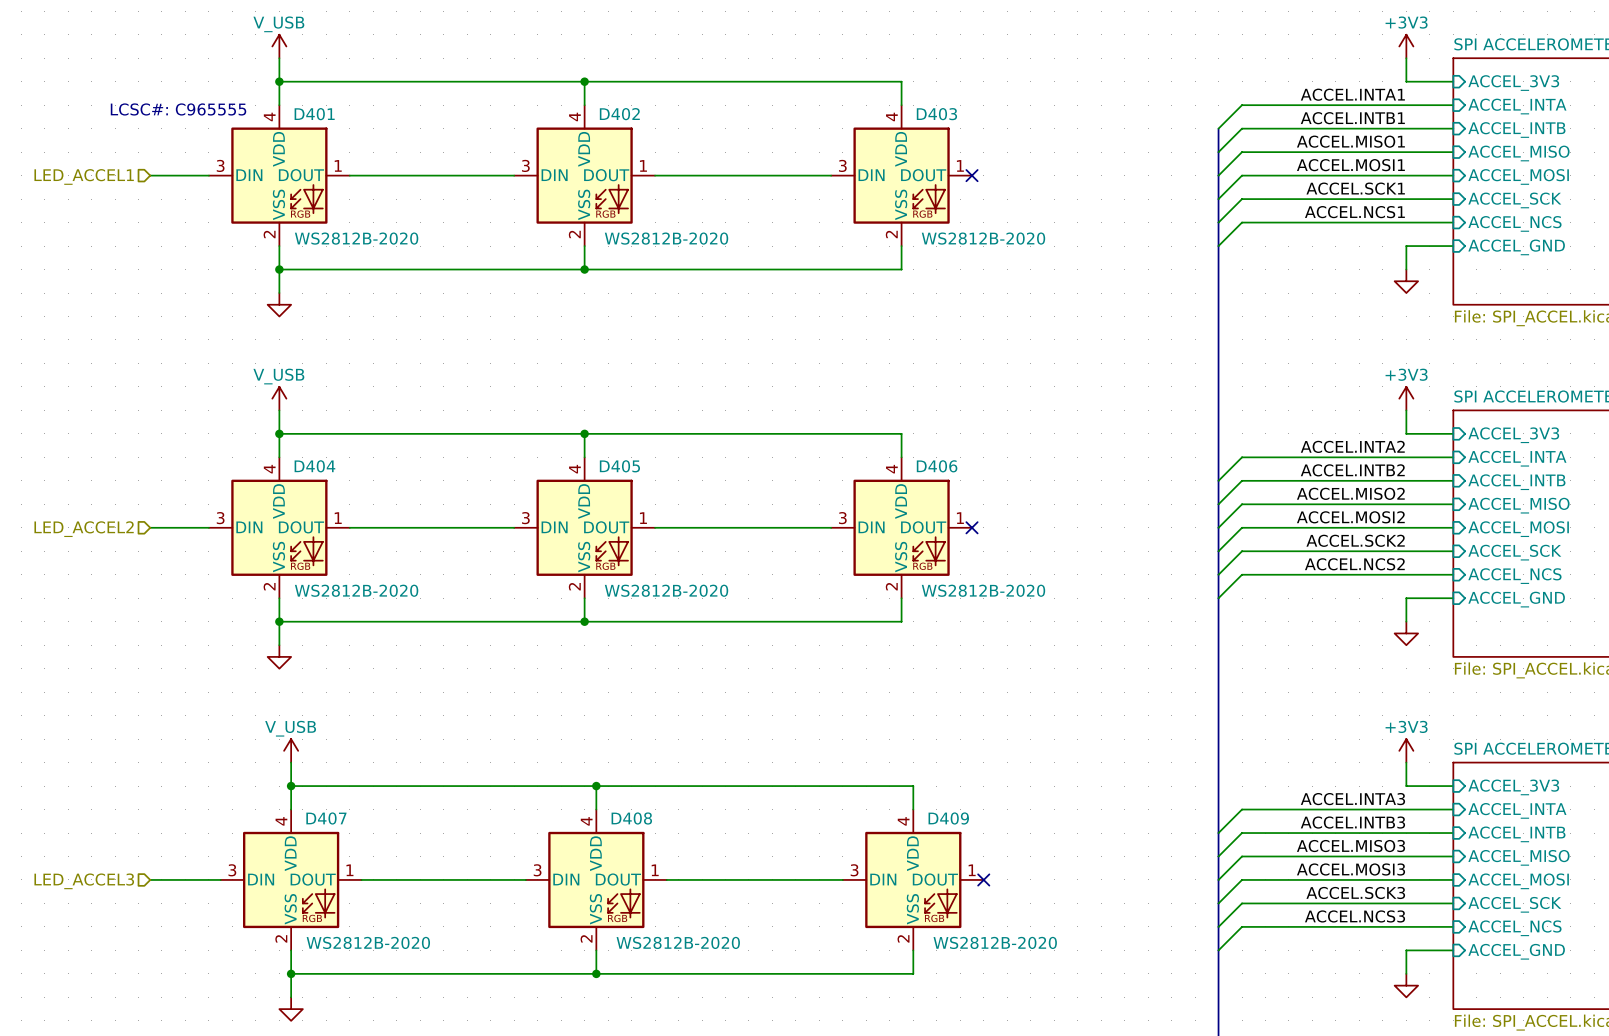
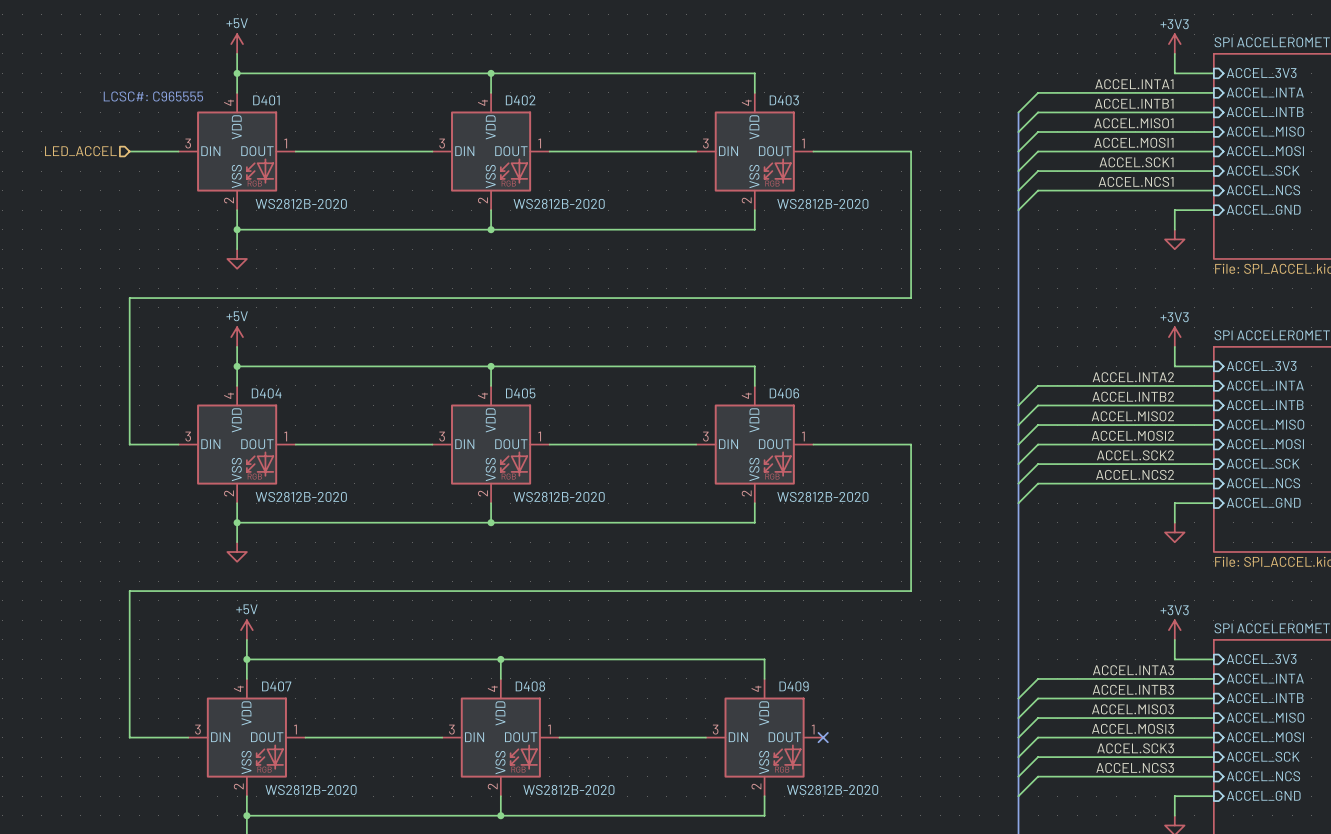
power symbol: V_USB (279, 46) -> +5V (237, 44)
wire: none -> (813, 151) (911, 151) (911, 298) (129, 298) (129, 444)
no-connect mark: (972, 175) -> none
hierarchical label: LED_ACCEL1 (84, 176) -> LED_ACCEL (80, 151)
power symbol: V_USB (279, 398) -> +5V (237, 337)
wire: none -> (813, 444) (911, 444) (911, 591) (129, 591) (129, 737)
no-connect mark: (972, 527) -> none
hierarchical label: LED_ACCEL2 (84, 529) -> none
power symbol: V_USB (291, 750) -> +5V (246, 630)
hierarchical label: LED_ACCEL3 (84, 881) -> none

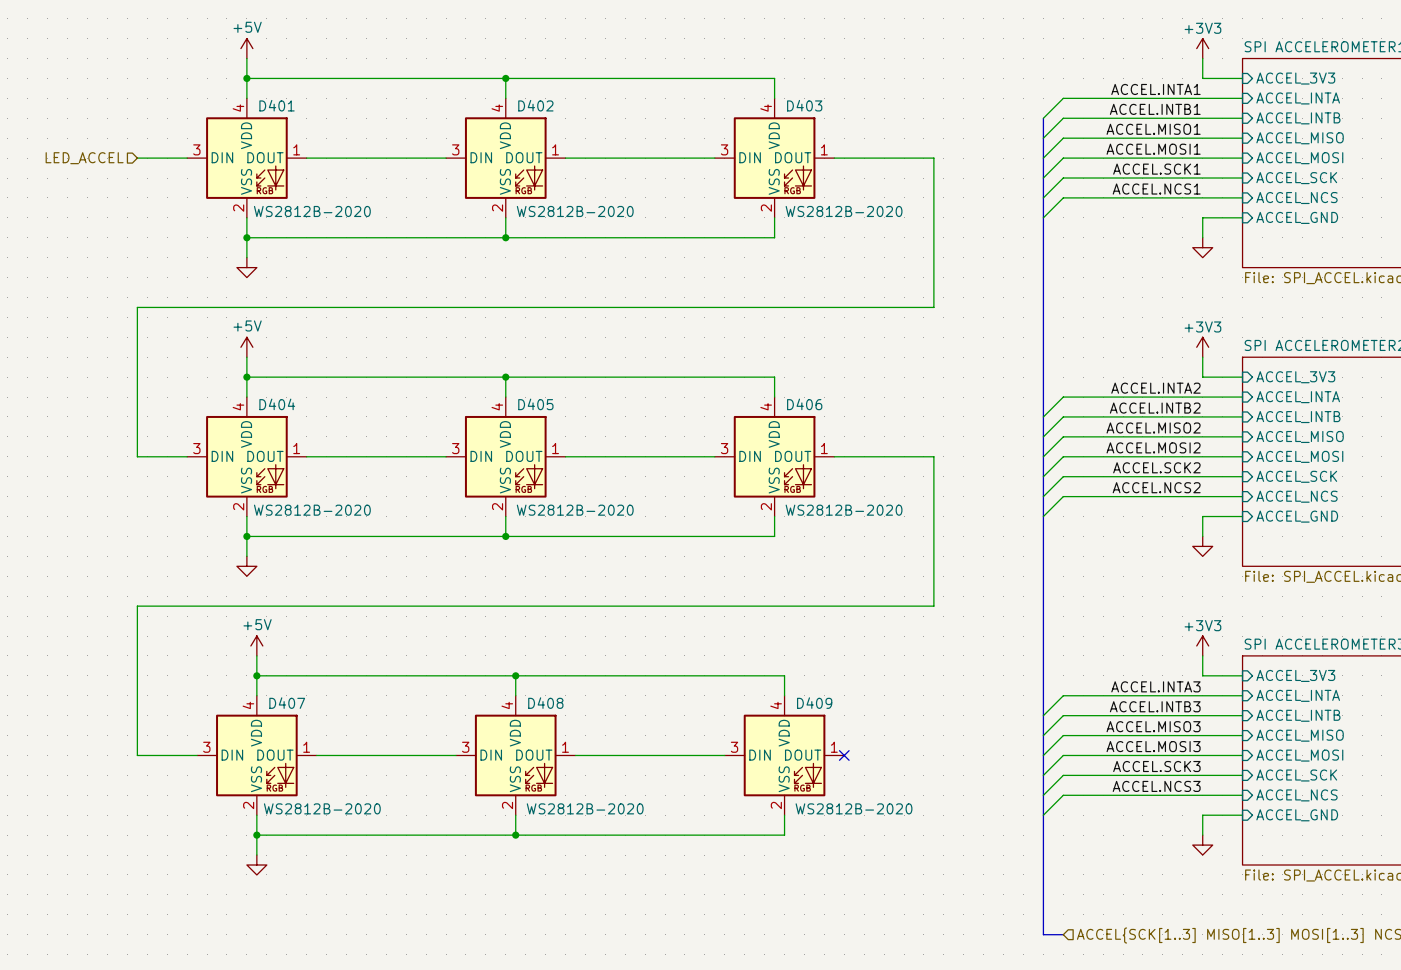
text: LCSC#: C965555 (153, 96) -> none

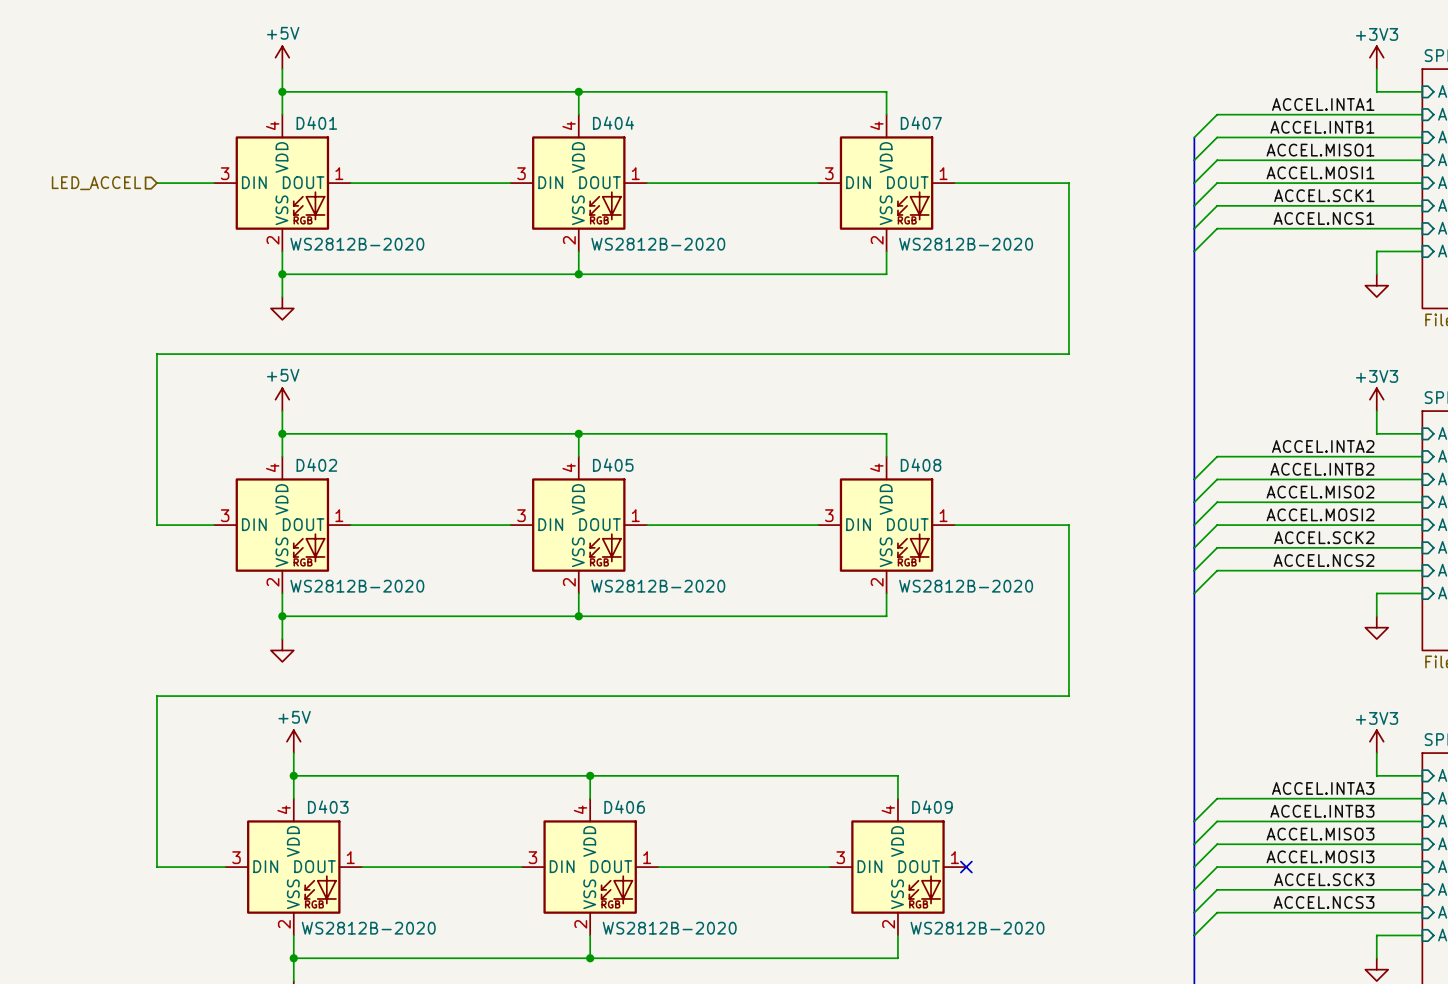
D402 name: D402 (535, 105) -> D404 (613, 123)
D403 name: D403 (804, 105) -> D407 (921, 123)
D404 name: D404 (277, 404) -> D402 (316, 465)
D406 name: D406 (804, 404) -> D408 (921, 465)
D407 name: D407 (287, 703) -> D403 (328, 807)
D408 name: D408 (545, 703) -> D406 (624, 807)

